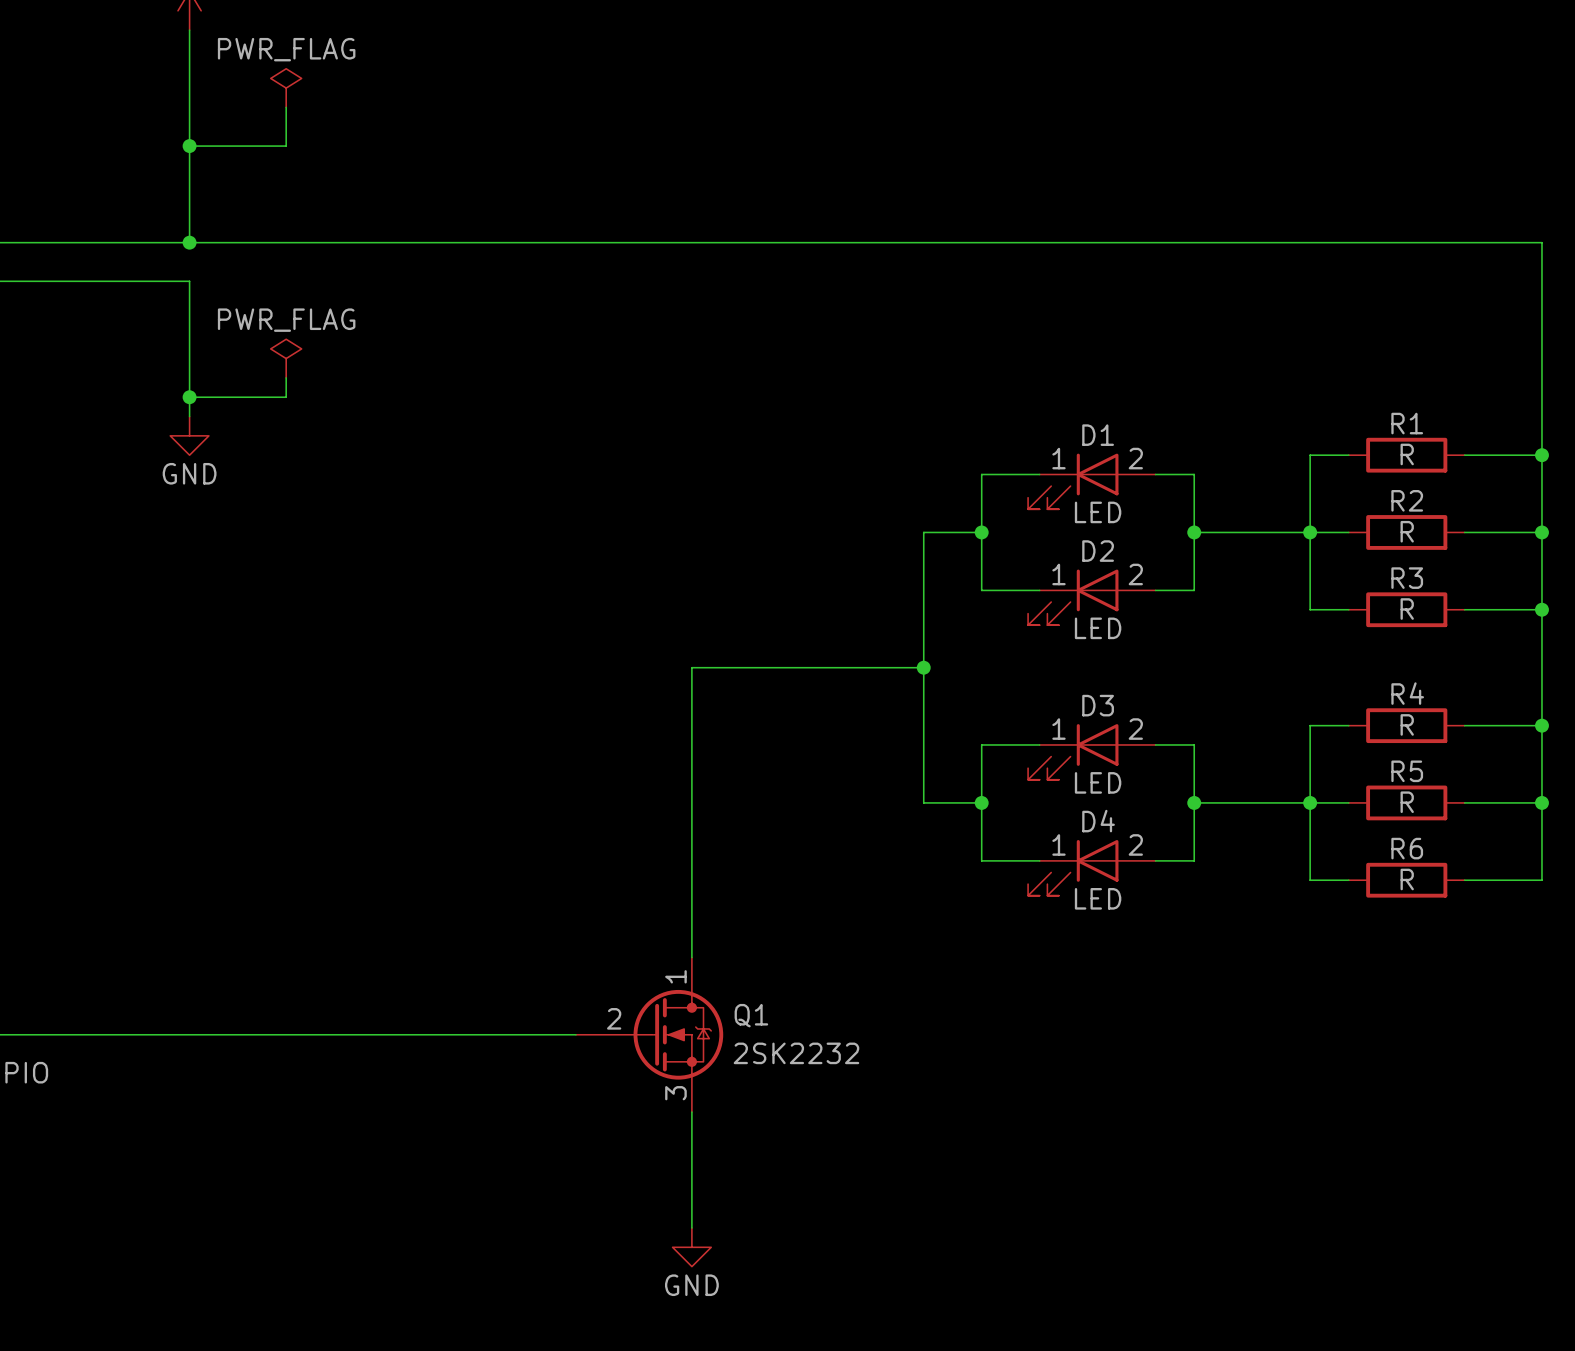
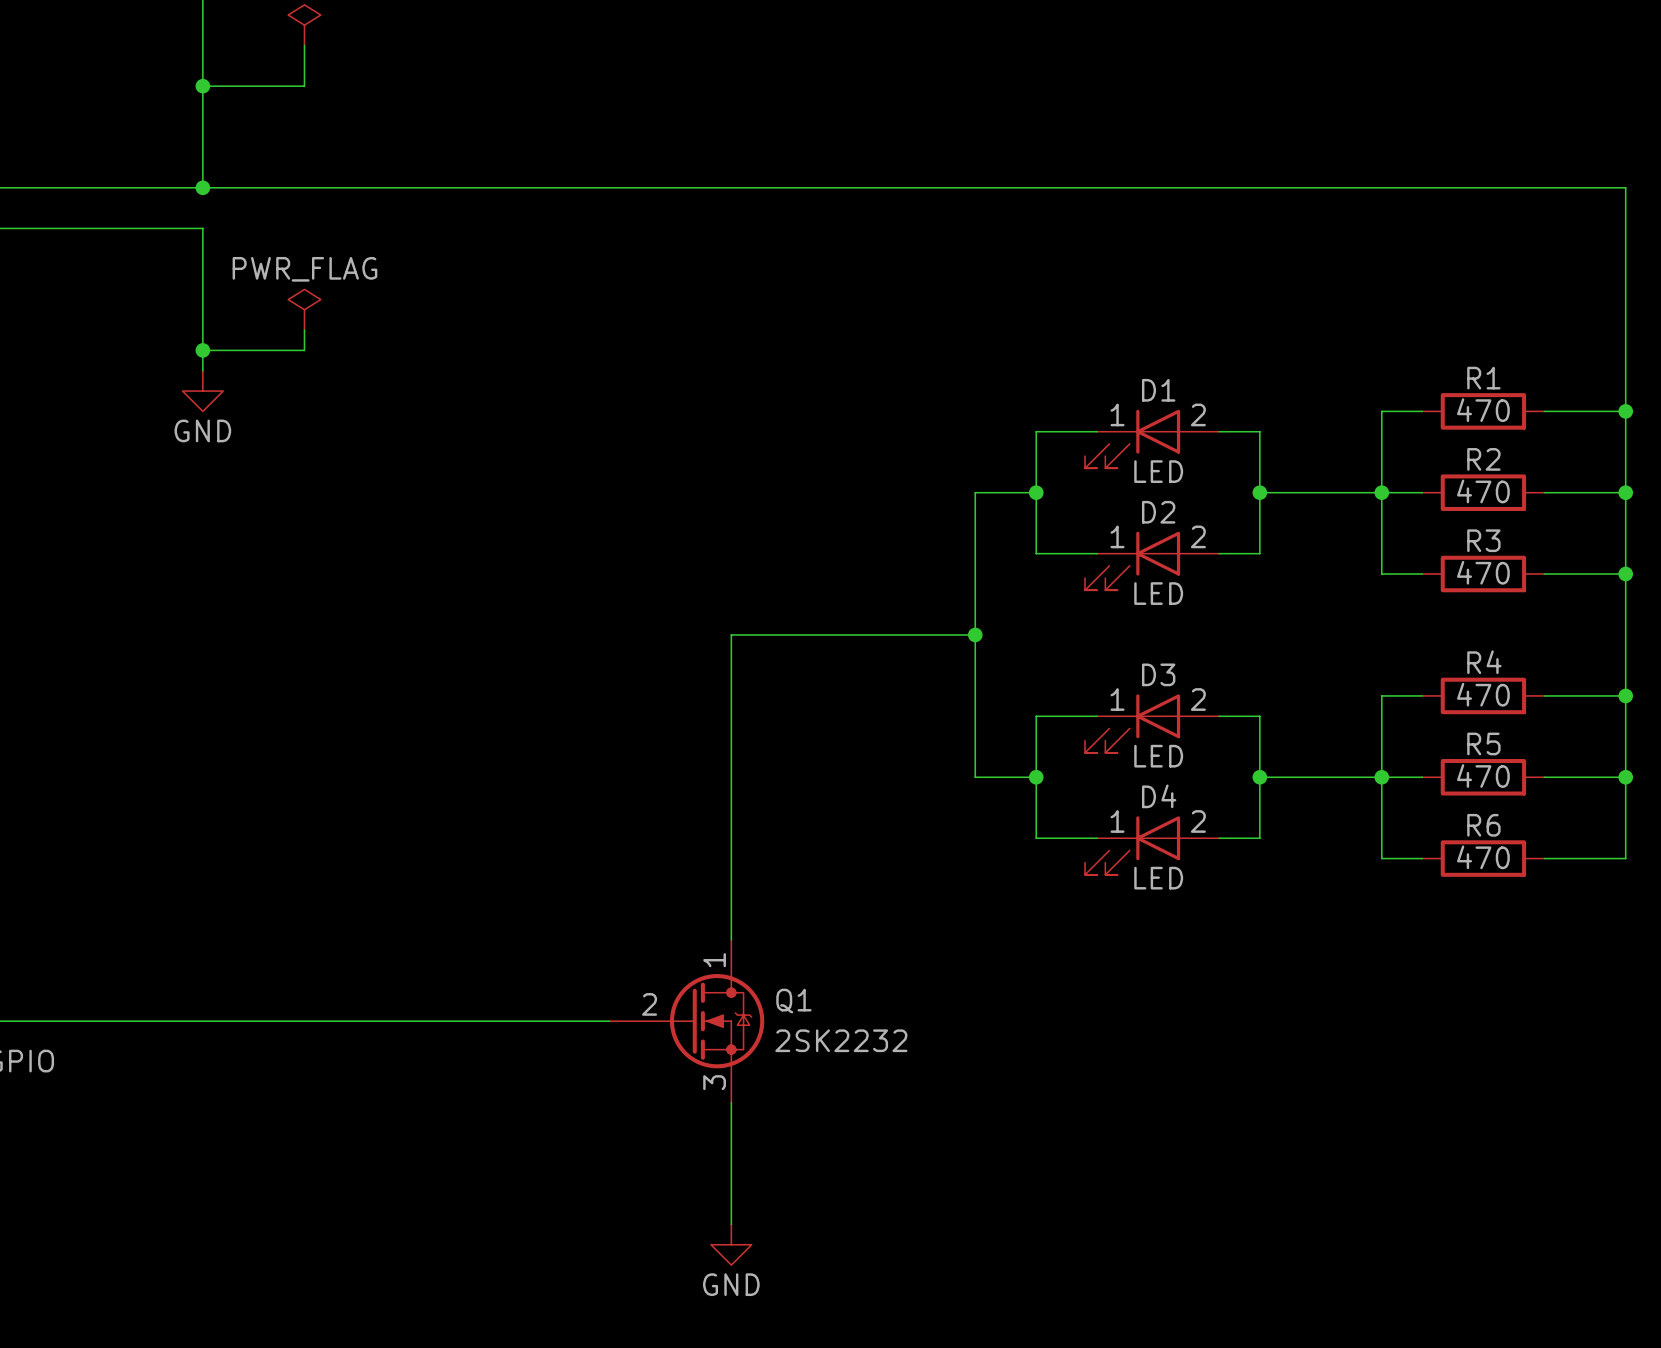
R1 value: R (1407, 454) -> 470 (1483, 410)
R2 value: R (1407, 531) -> 470 (1483, 491)
R3 value: R (1407, 609) -> 470 (1483, 572)
R4 value: R (1407, 724) -> 470 (1483, 694)
R5 value: R (1407, 802) -> 470 (1483, 776)
R6 value: R (1407, 879) -> 470 (1483, 857)

